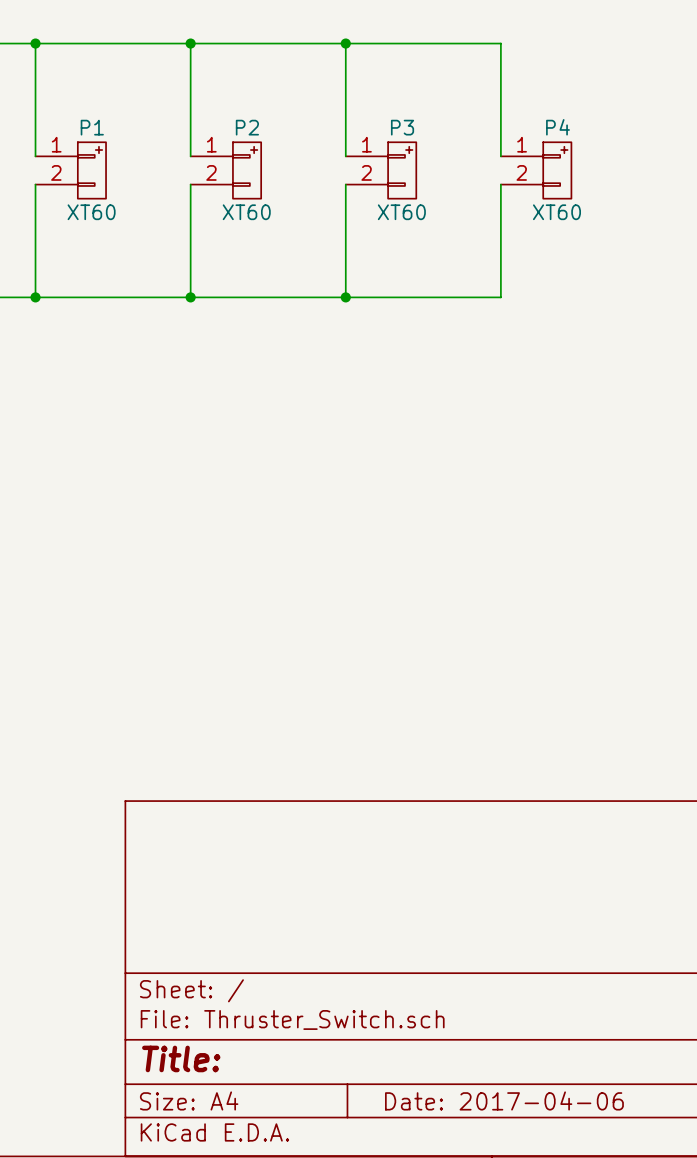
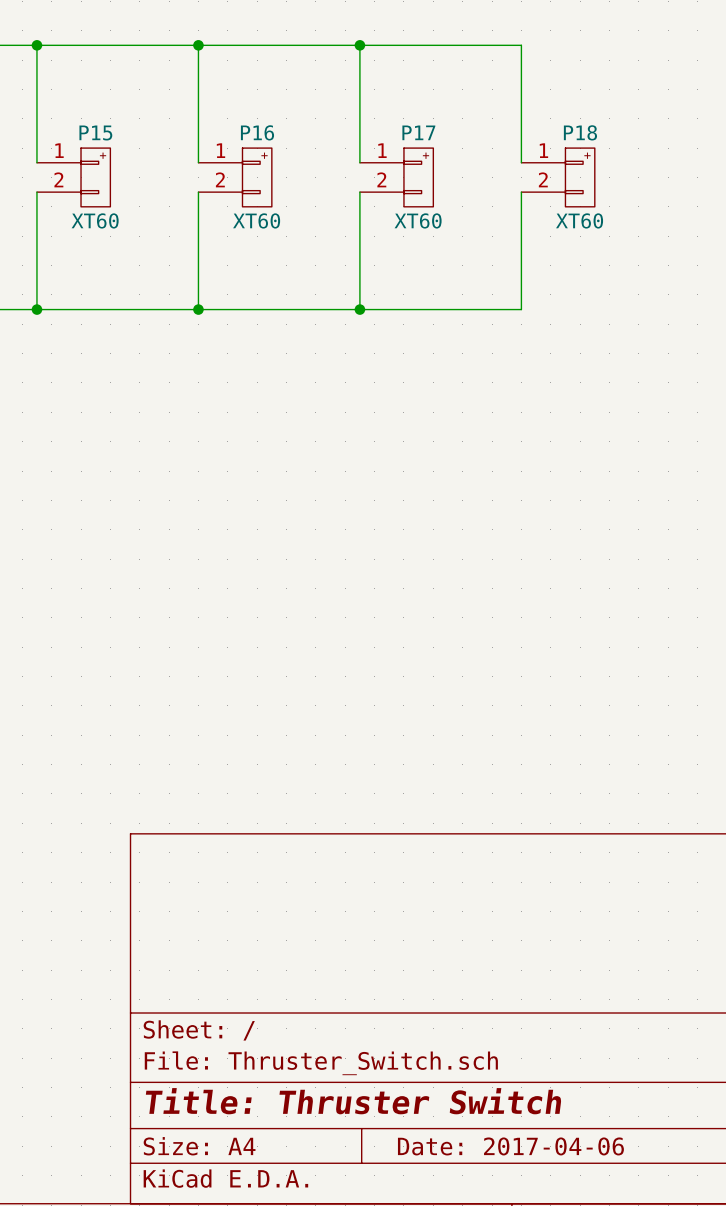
P1 name: P1 (92, 127) -> P15 (95, 133)
P2 name: P2 (247, 127) -> P16 (257, 132)
P3 name: P3 (402, 127) -> P17 (418, 132)
P4 name: P4 (557, 127) -> P18 (580, 132)
title block: Title: (181, 1058) -> Title: Thruster Switch (353, 1101)

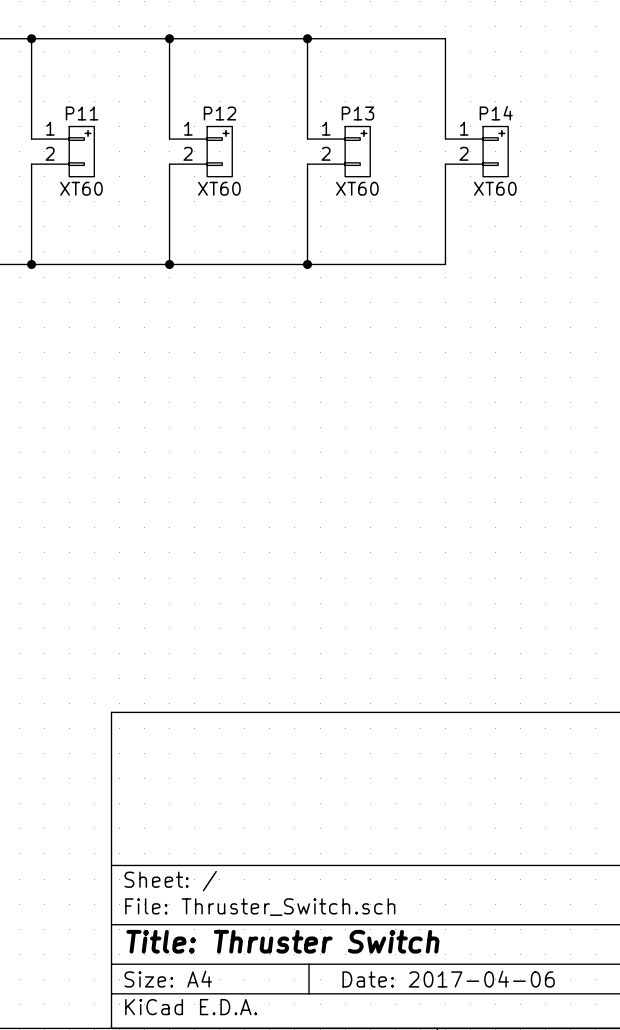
P16 name: P16 (257, 132) -> P12 (220, 113)
P17 name: P17 (418, 132) -> P13 (357, 113)
P18 name: P18 (580, 132) -> P14 (496, 113)
P15 name: P15 (95, 133) -> P11 (82, 113)

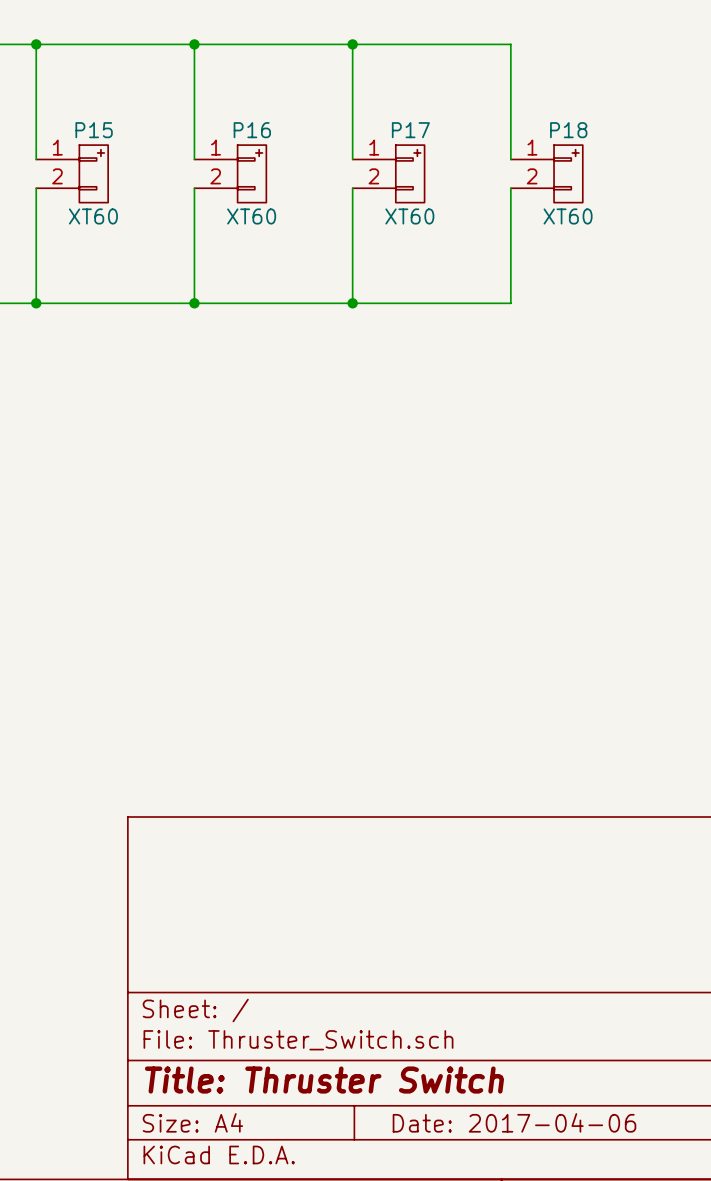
P11 name: P11 (82, 113) -> P15 (94, 130)
P12 name: P12 (220, 113) -> P16 (252, 130)
P13 name: P13 (357, 113) -> P17 (410, 130)
P14 name: P14 (496, 113) -> P18 (568, 130)

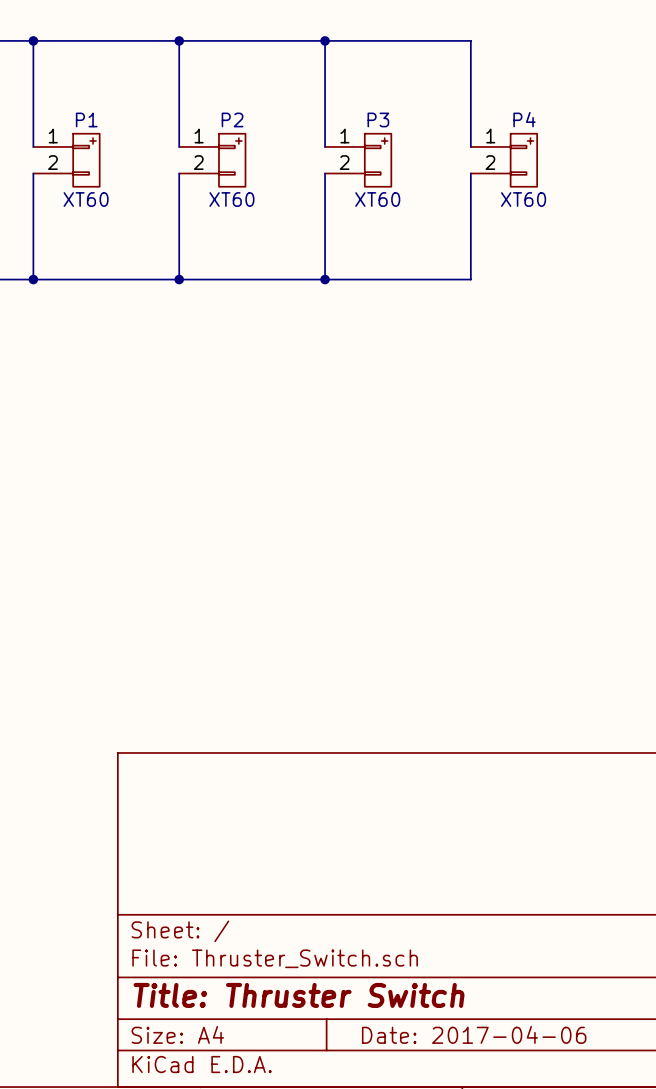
P15 name: P15 (94, 130) -> P1 (86, 119)
P16 name: P16 (252, 130) -> P2 (232, 119)
P17 name: P17 (410, 130) -> P3 (378, 119)
P18 name: P18 (568, 130) -> P4 (524, 119)

